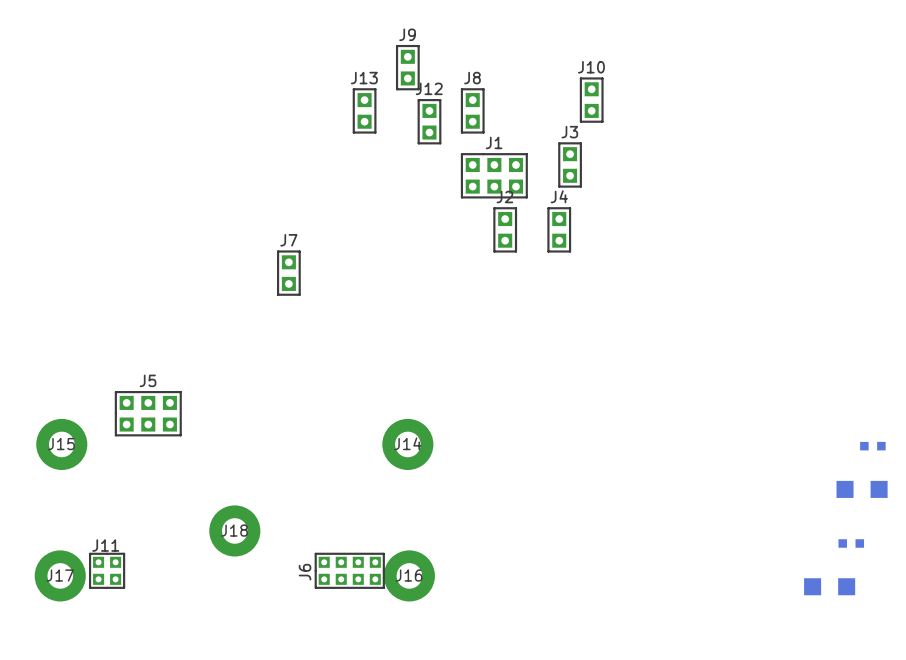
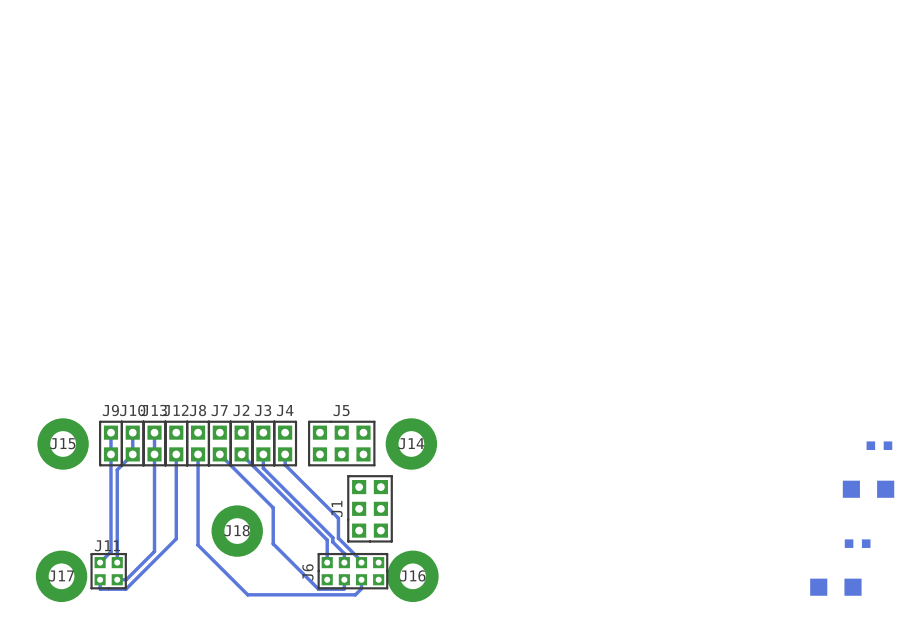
J9 position: (407, 67) -> (110, 443)
J10 position: (591, 100) -> (132, 443)
J13 position: (364, 110) -> (154, 443)
J8 position: (472, 110) -> (198, 443)
J12 position: (429, 121) -> (176, 443)
J3 position: (570, 164) -> (263, 443)
J1 rotation: 0° (494, 175) -> 90° counterclockwise (370, 508)
J1 position: (494, 175) -> (370, 508)
J2 position: (505, 229) -> (241, 443)
J4 position: (559, 229) -> (285, 443)
J7 position: (288, 273) -> (219, 443)
J5 position: (148, 413) -> (341, 443)
bottom track: none -> (110, 432) (110, 551) (100, 562)
bottom track: none -> (132, 432) (132, 454) (117, 469) (117, 562)
bottom track: none -> (154, 432) (154, 551) (126, 579) (117, 579)
bottom track: none -> (176, 454) (176, 538) (125, 589) (100, 589) (100, 579)
bottom track: none -> (198, 454) (198, 545) (247, 594) (355, 594) (361, 588) (361, 579)
bottom track: none -> (219, 454) (273, 507) (273, 543) (318, 589) (343, 589) (344, 579)
bottom track: none -> (241, 454) (327, 540) (327, 562)
bottom track: none -> (263, 454) (263, 468) (332, 537) (332, 542) (344, 553) (344, 562)
bottom track: none -> (285, 454) (285, 464) (338, 518) (338, 538) (361, 562)

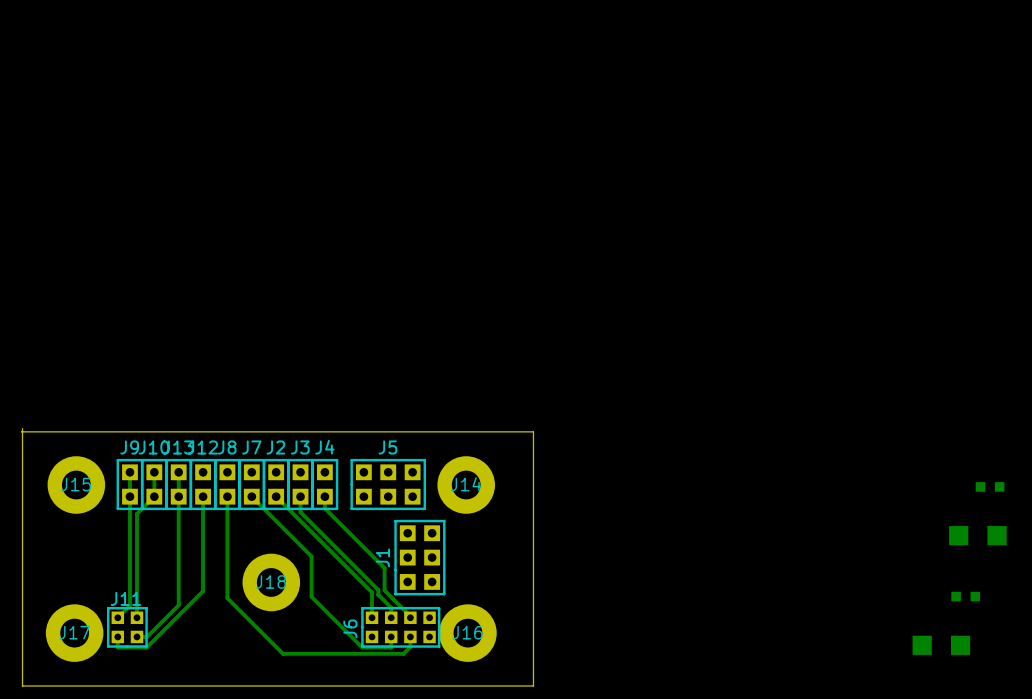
board edge: none -> (22, 428) (22, 685) (533, 685) (533, 431) (21, 431)

